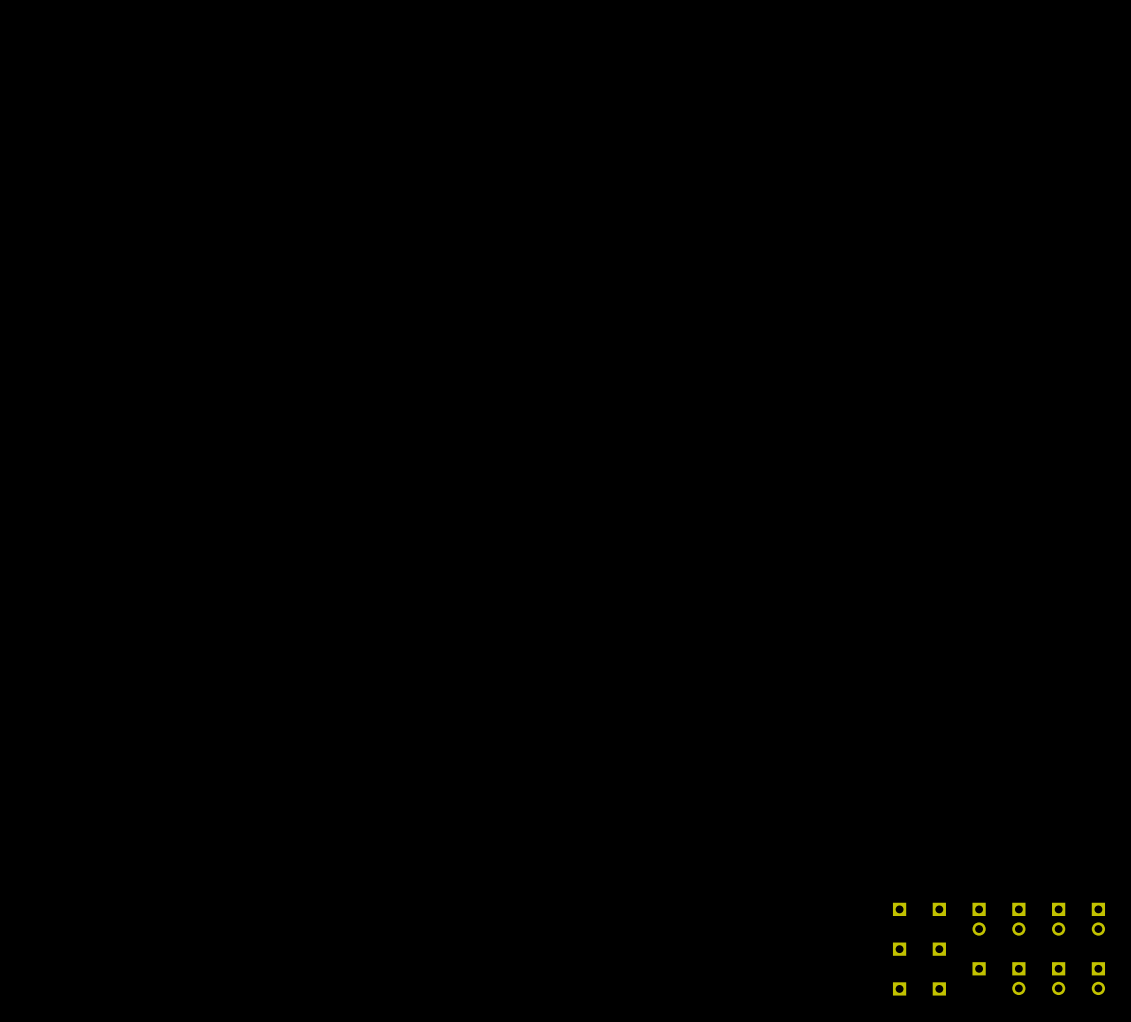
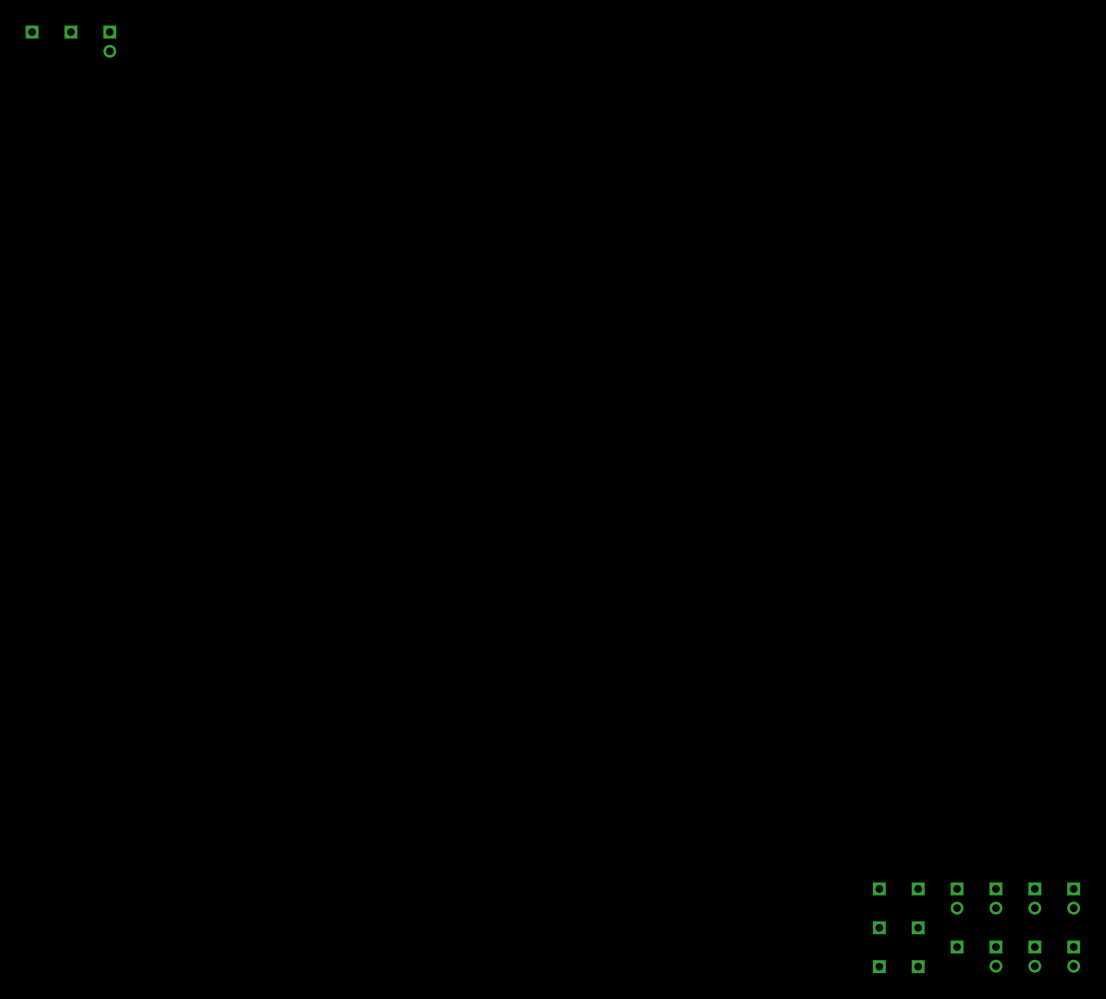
part: none -> (32, 32)
part: none -> (70, 32)
part: none -> (109, 41)

